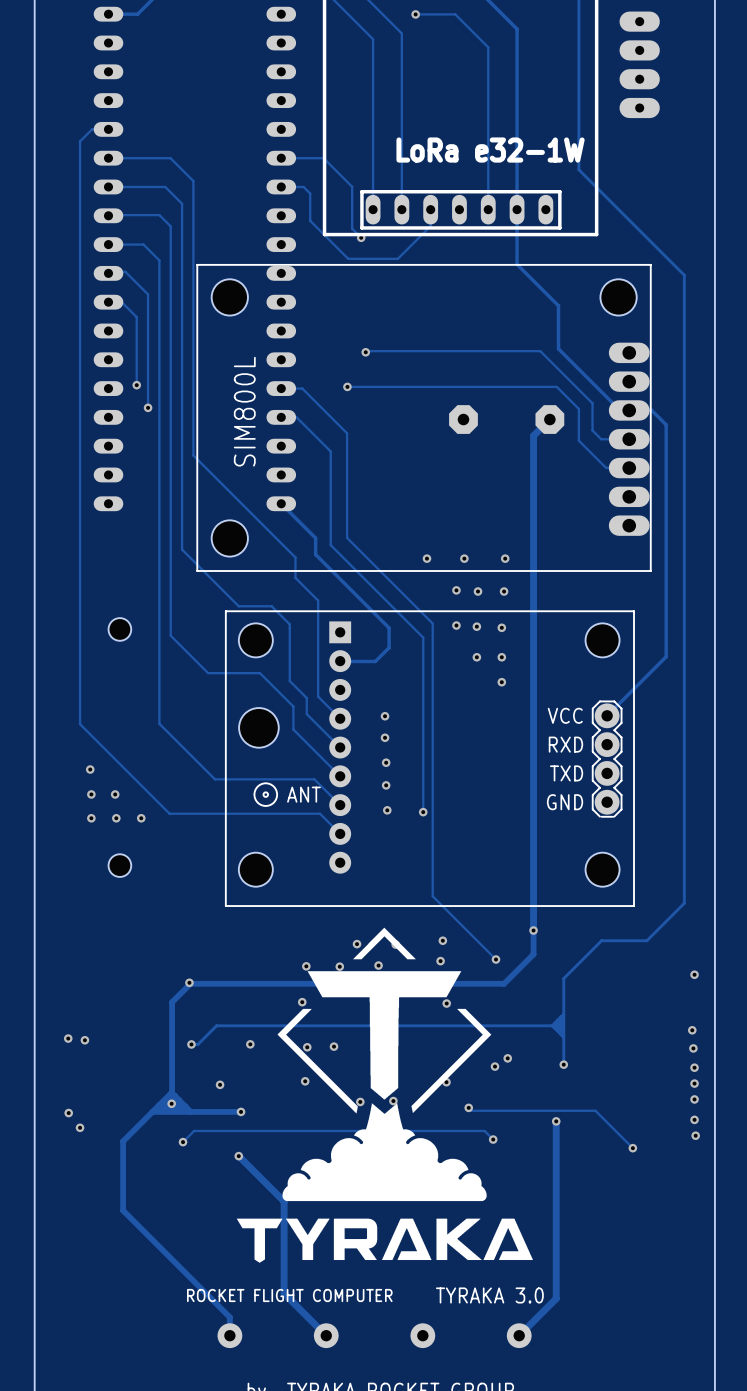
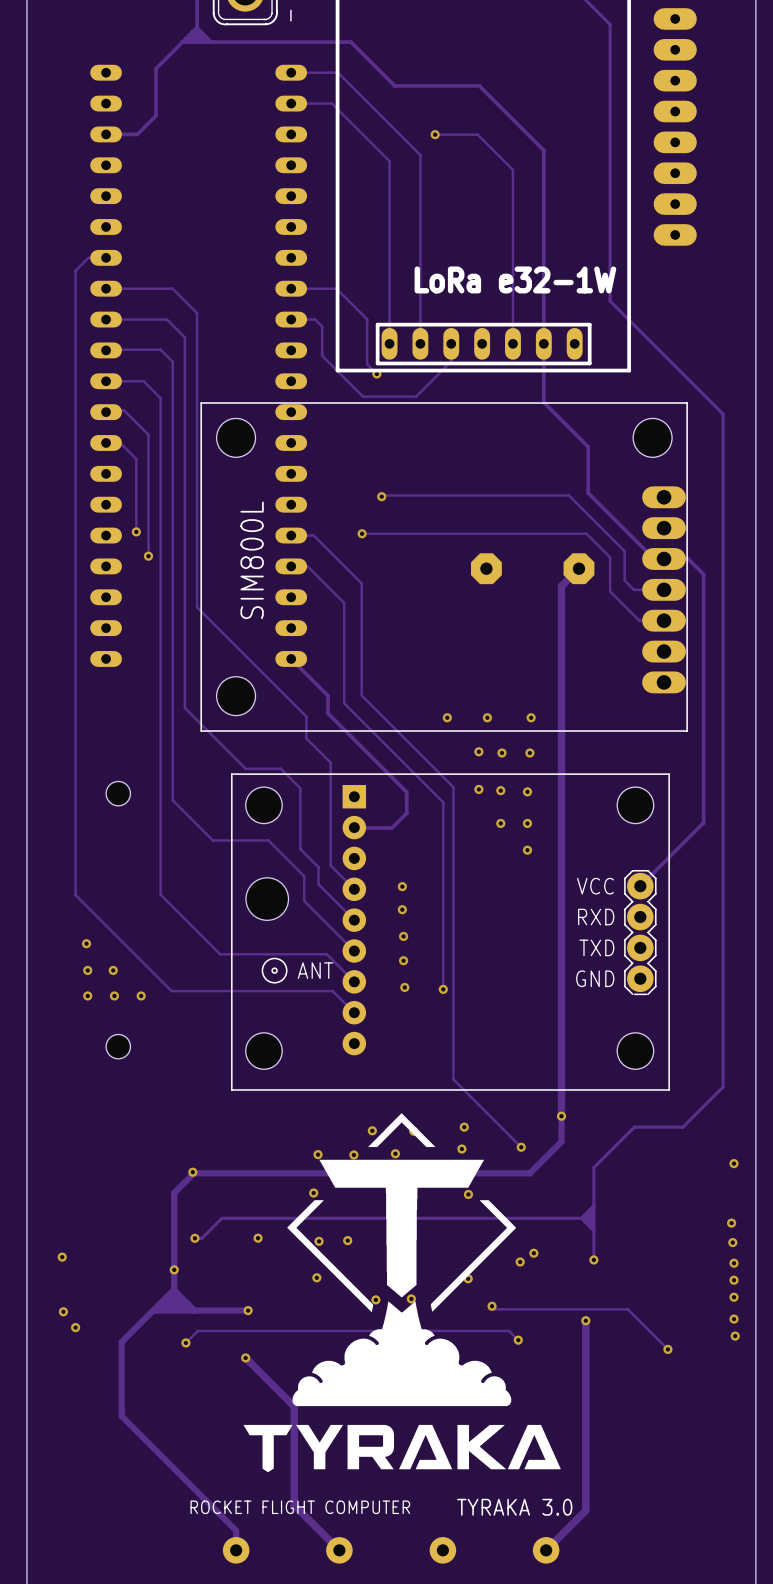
via: (68, 1038) -> none
via: (84, 1040) -> none
via: none -> (62, 1257)
via: none -> (174, 1269)
via: (220, 1084) -> none
via: (171, 1103) -> none

